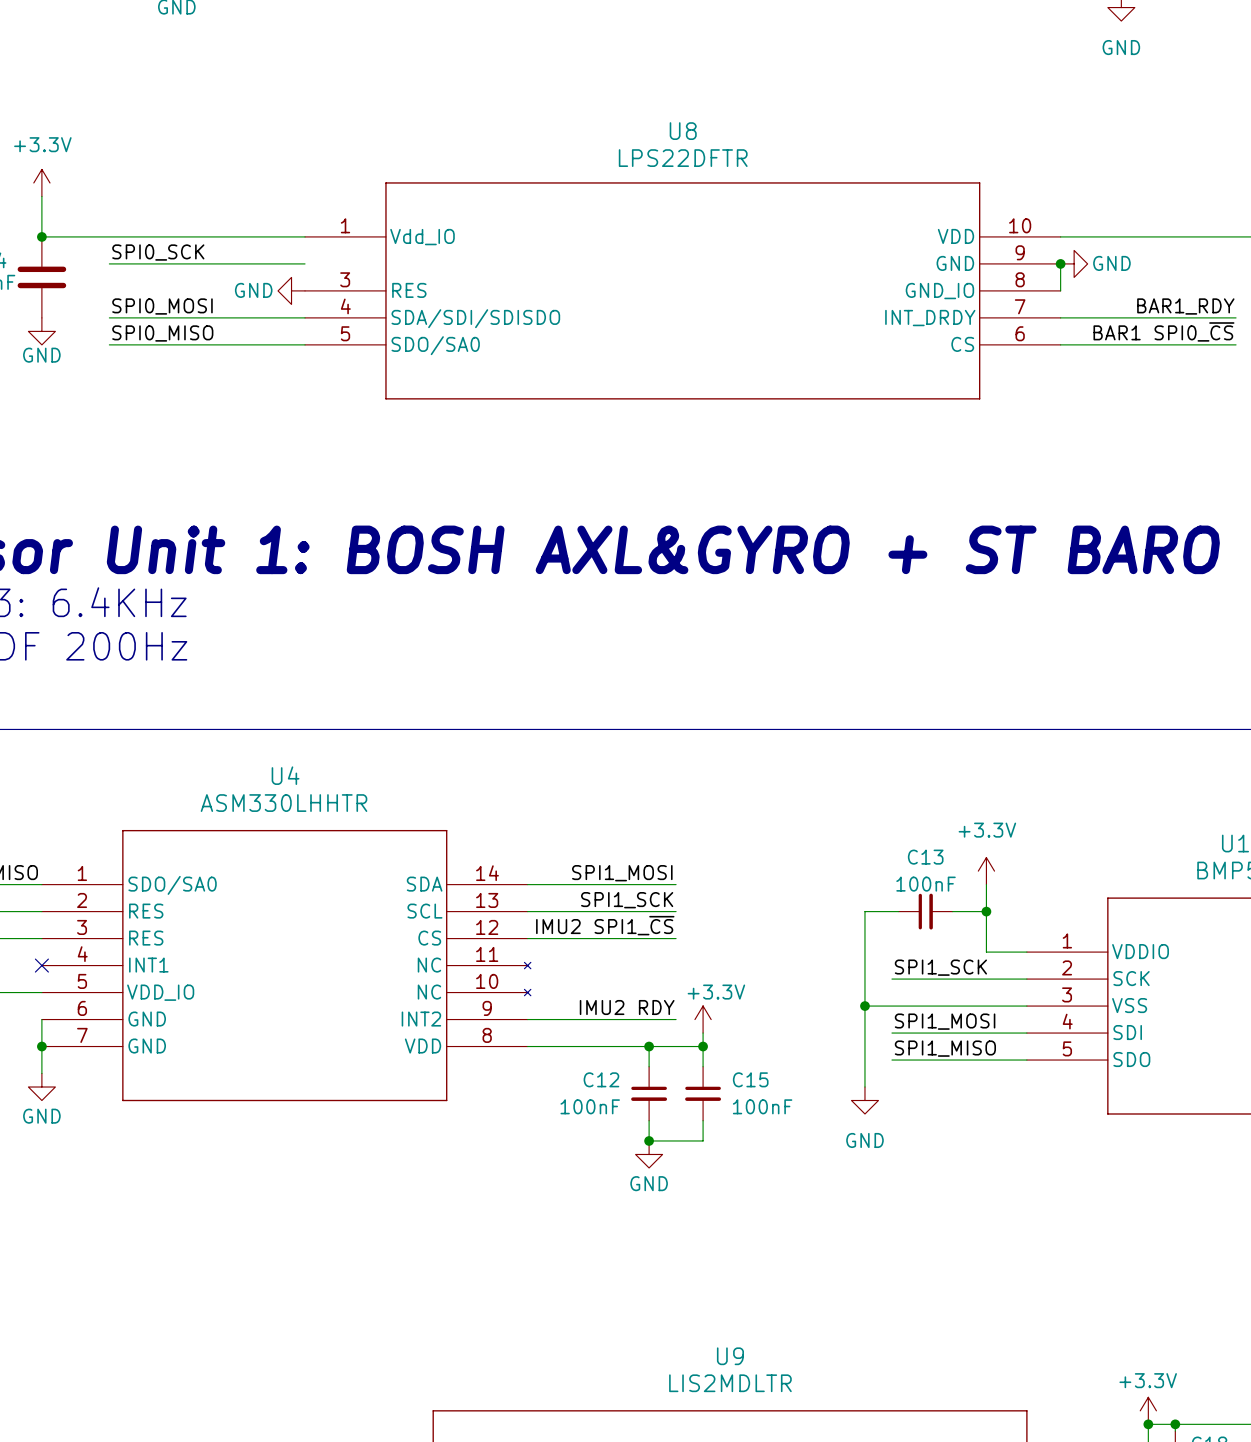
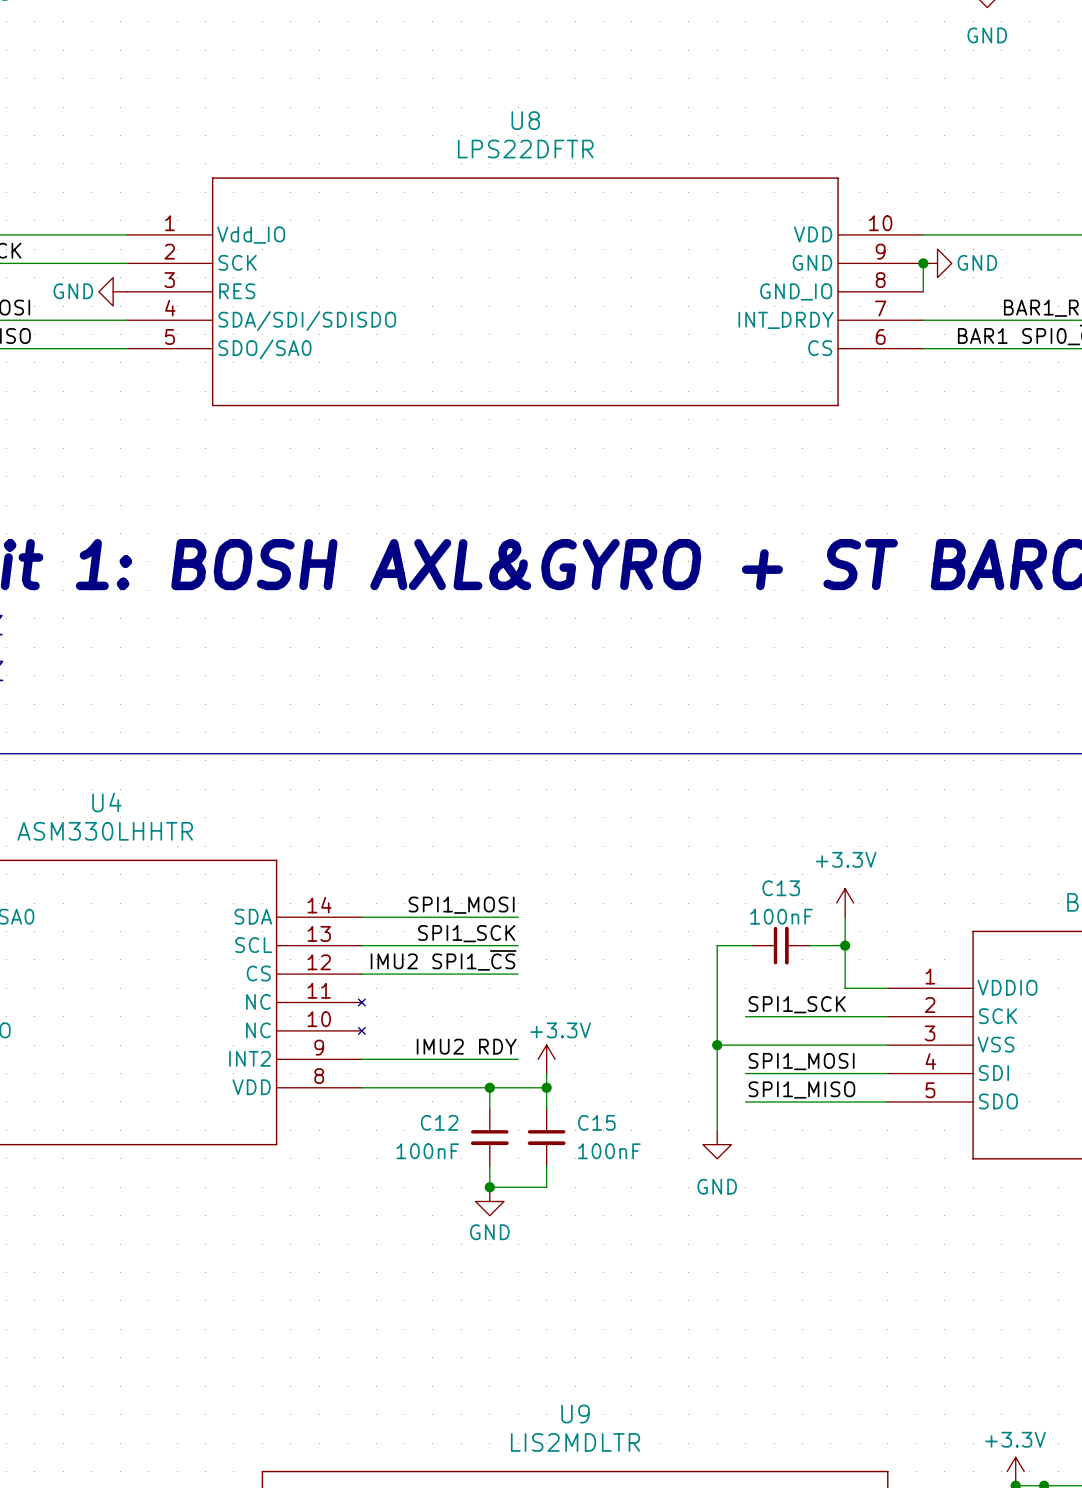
U8 symbol: [305, 182, 1061, 400] -> [127, 177, 924, 407]

